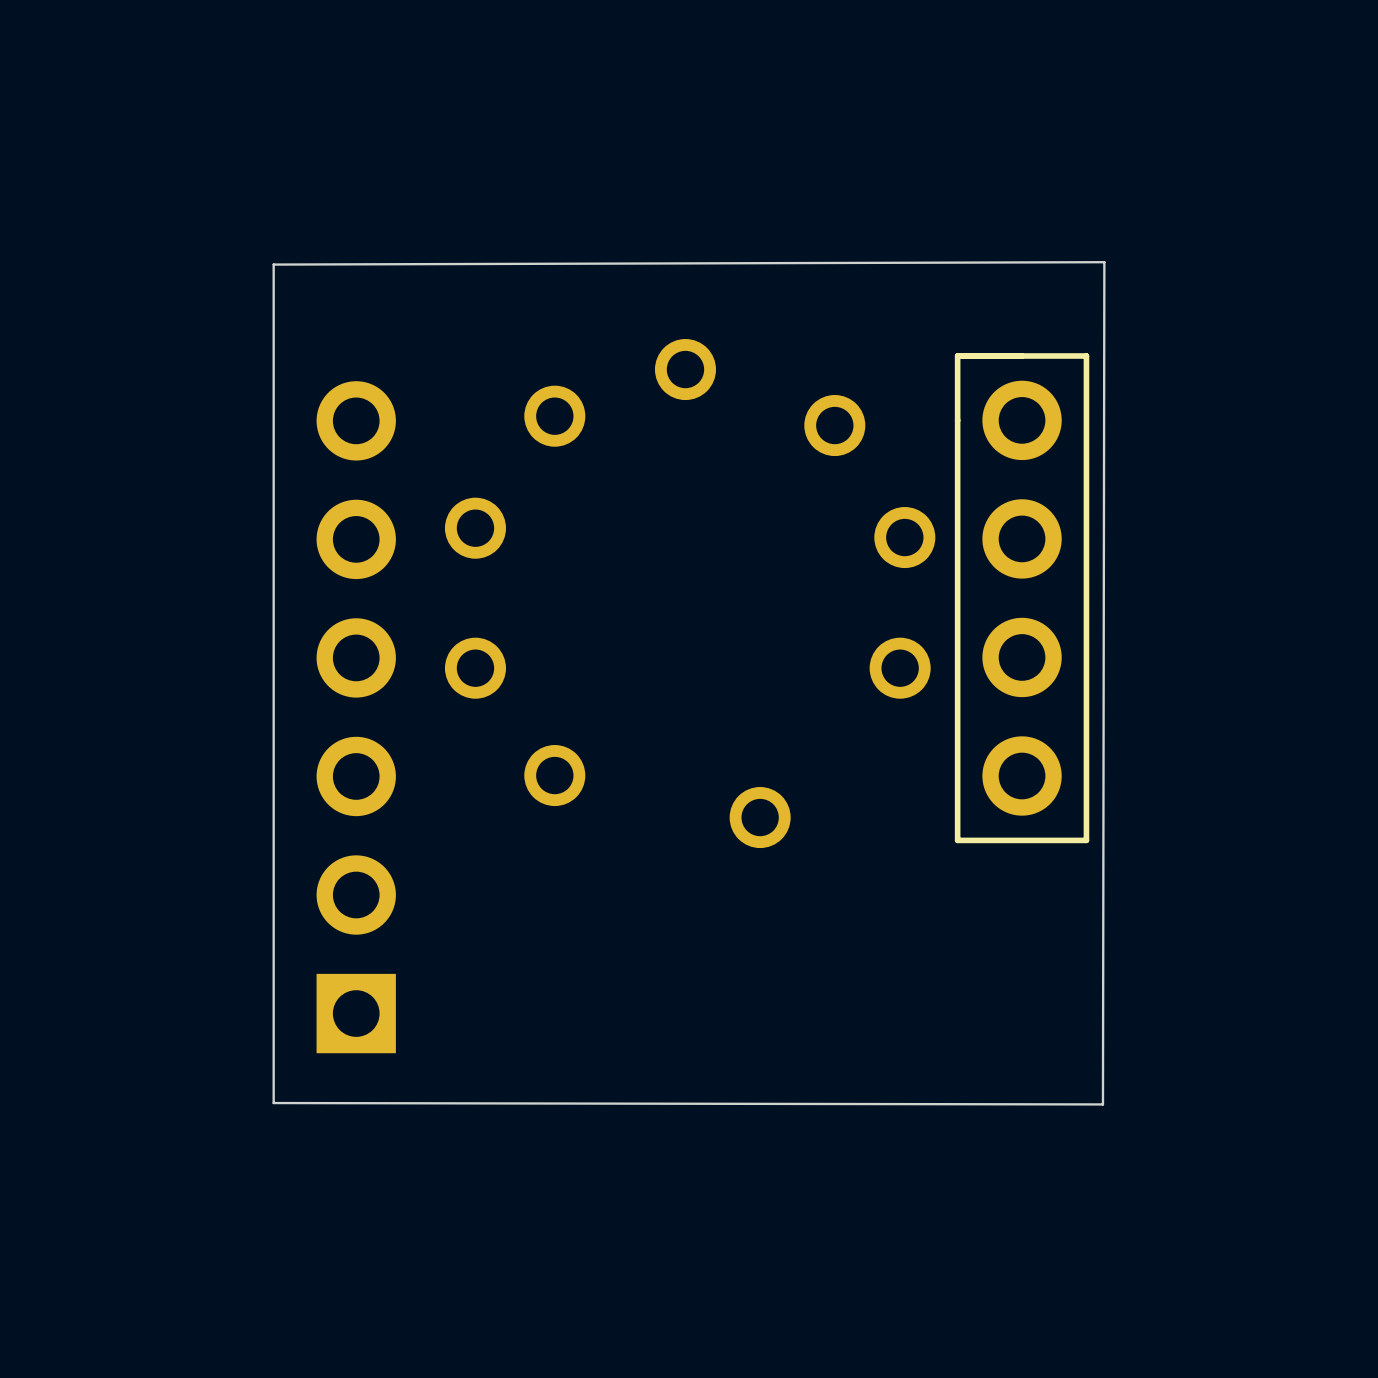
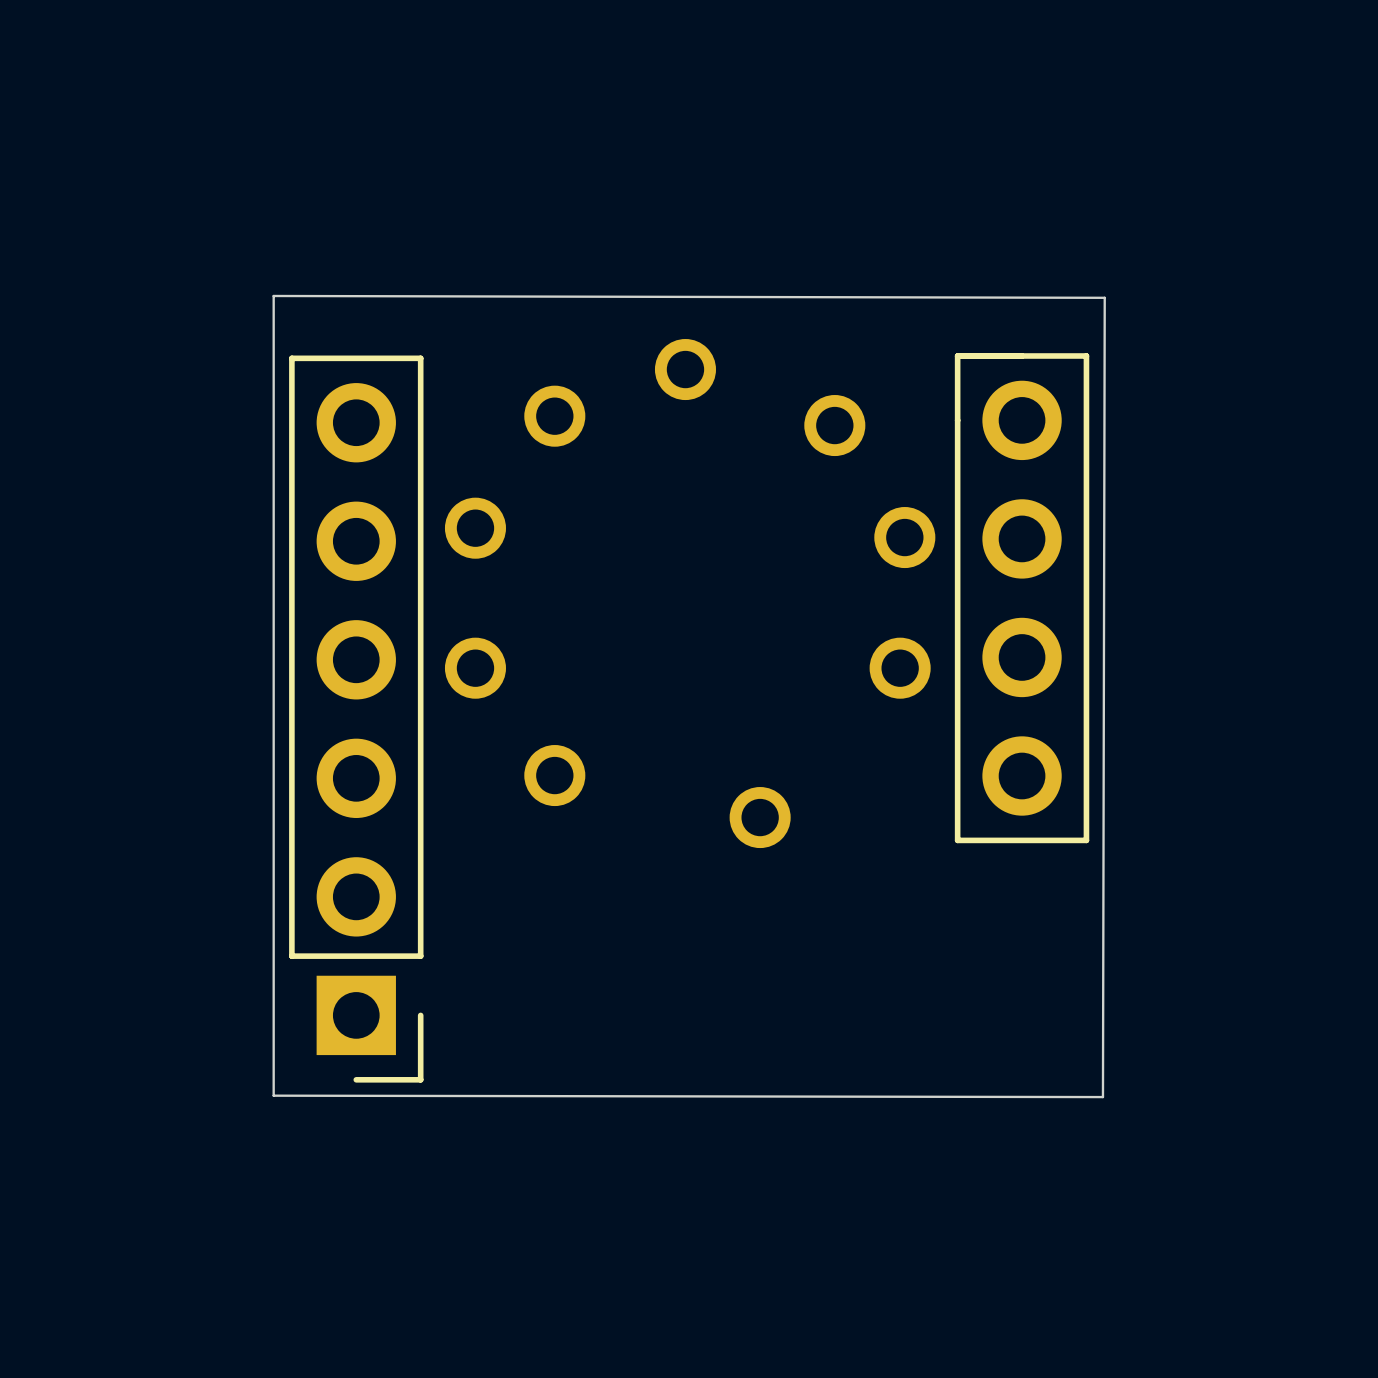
board edge: (273, 295) (273, 264) (1104, 262) (1102, 1104) (273, 1103) (273, 1095) -> (273, 295) (1104, 297) (1102, 1097) (273, 1095)
part side: top (356, 717) -> bottom (356, 719)

